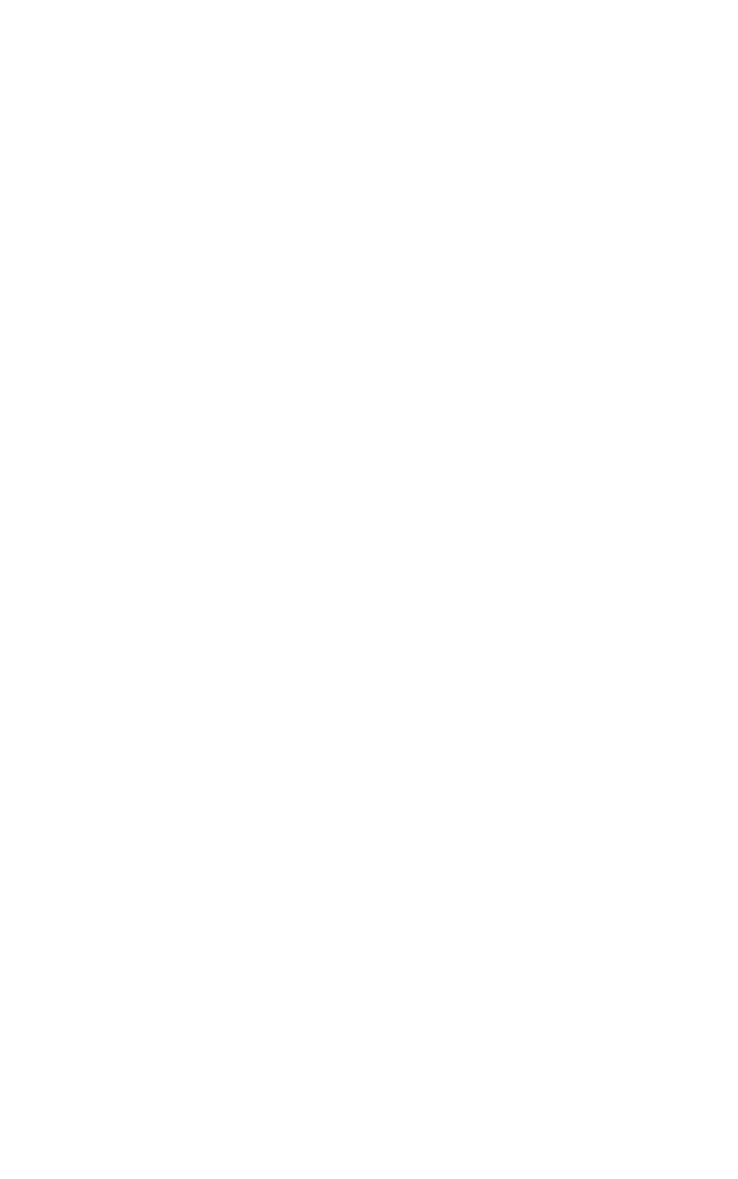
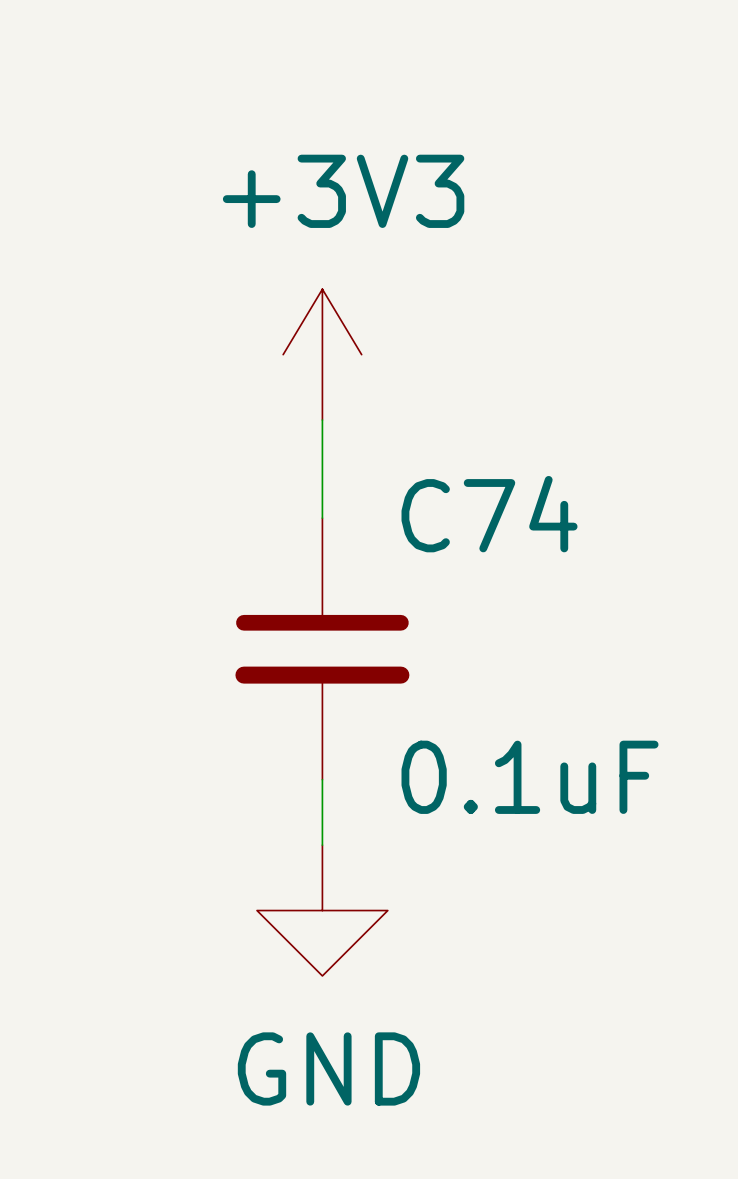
power symbol: none -> +3V3 (322, 354)
wire: none -> (322, 420) (322, 518)
C74: none -> 0.1uF (322, 648)
wire: none -> (322, 779) (322, 845)
power symbol: none -> GND (322, 910)

